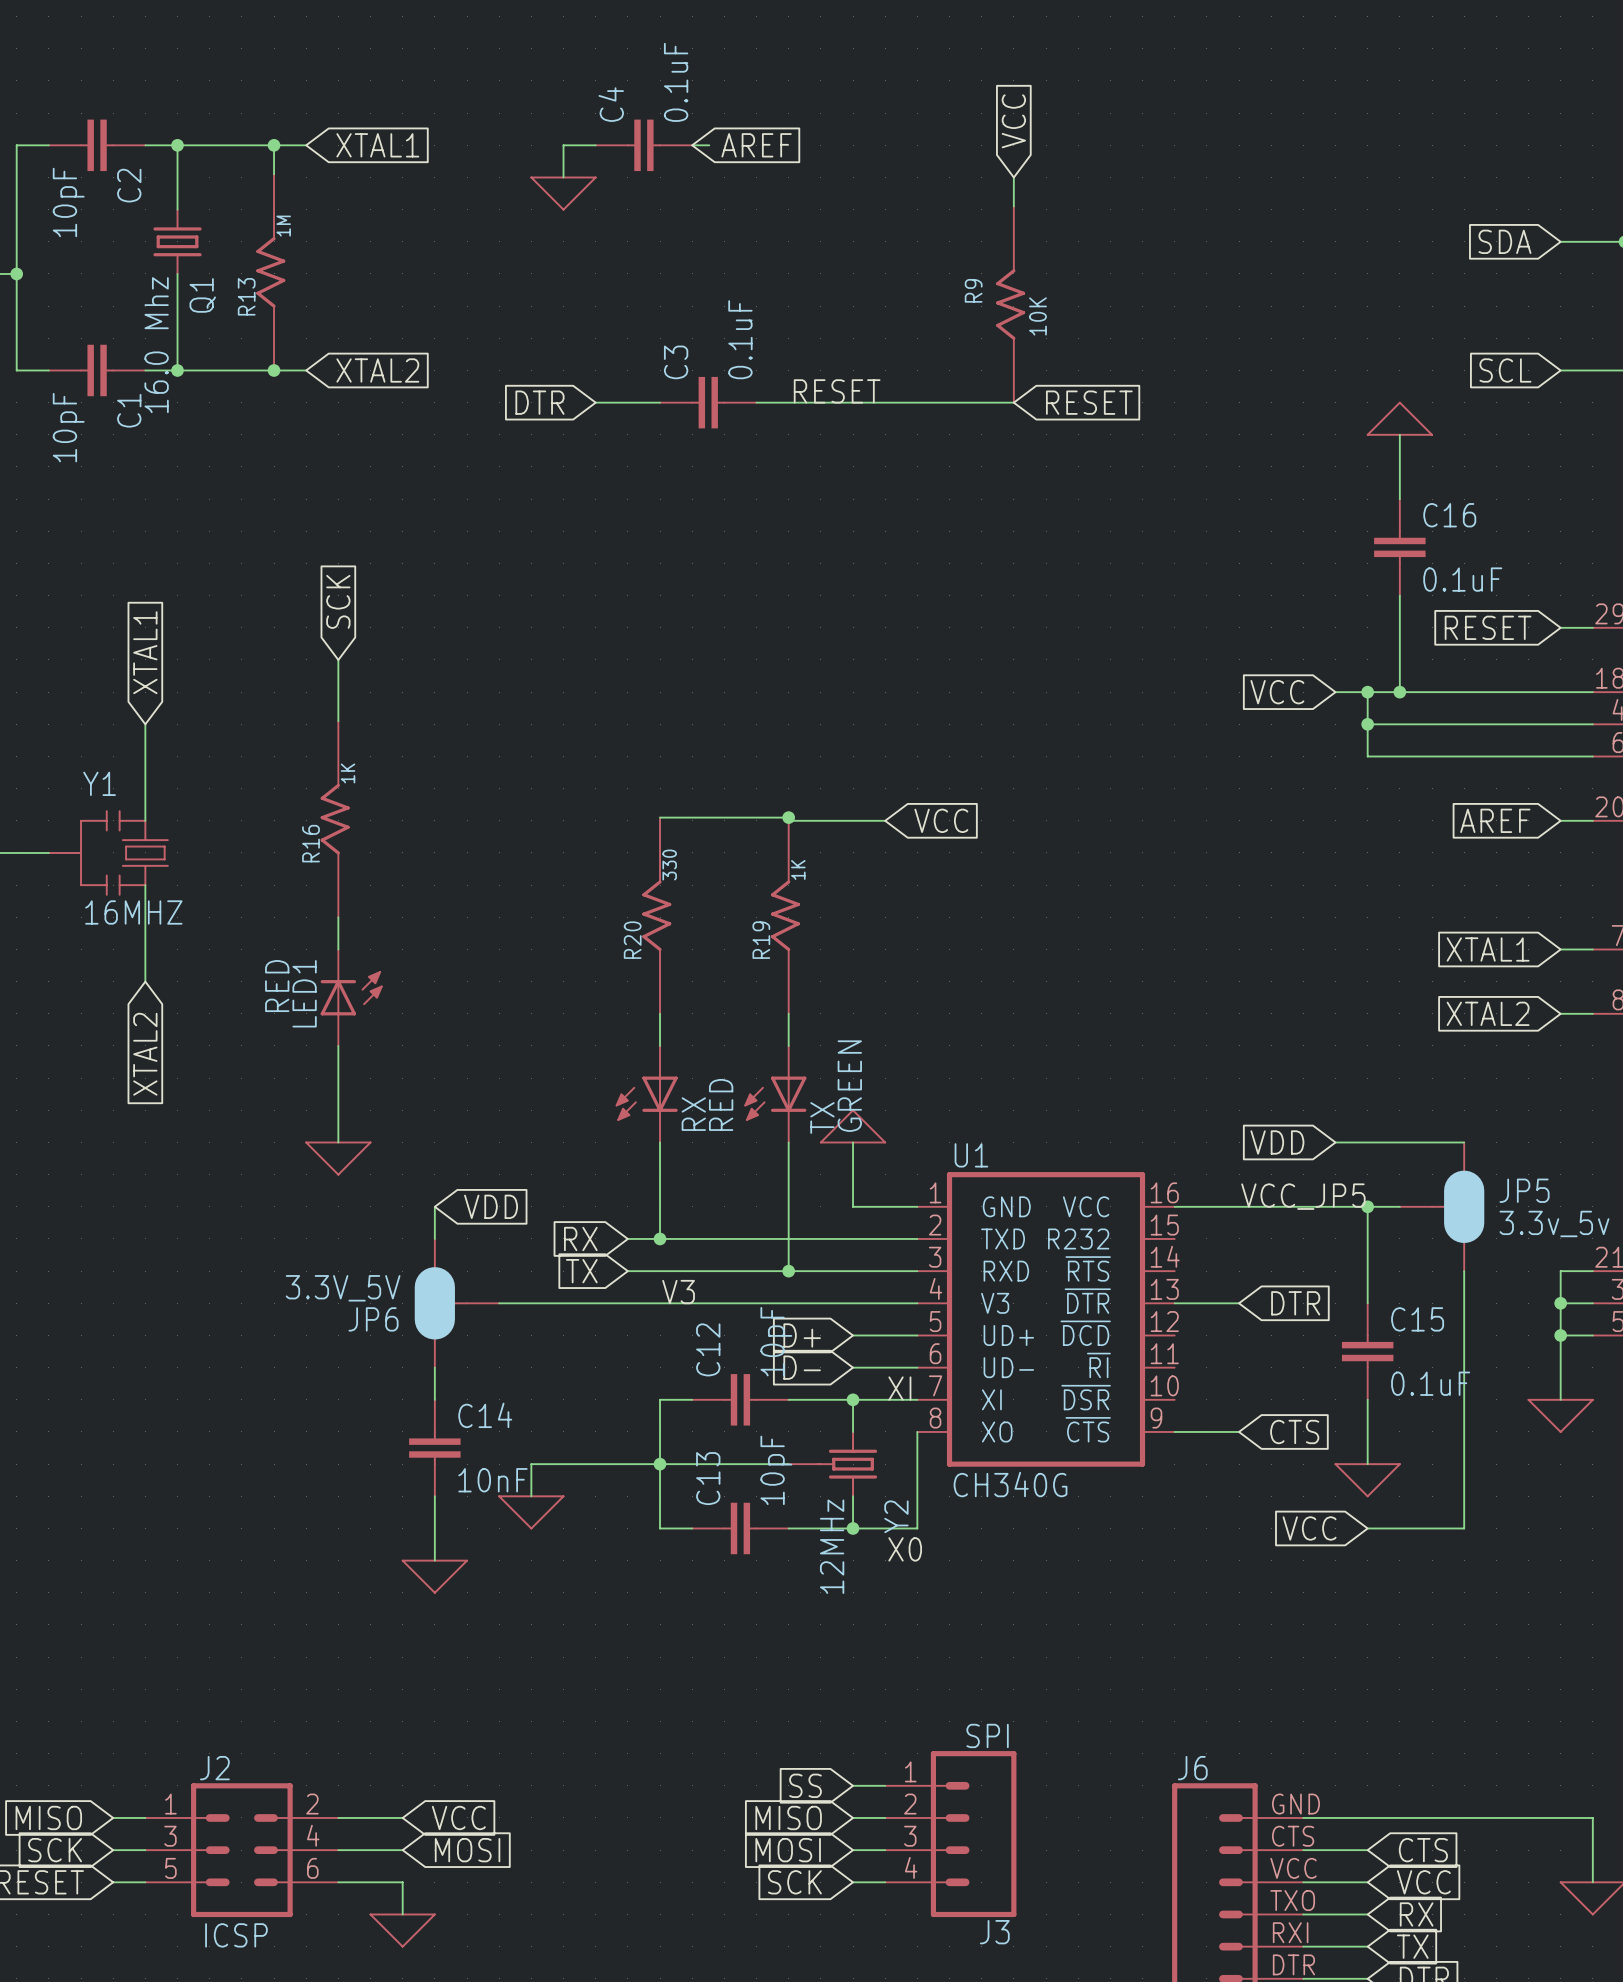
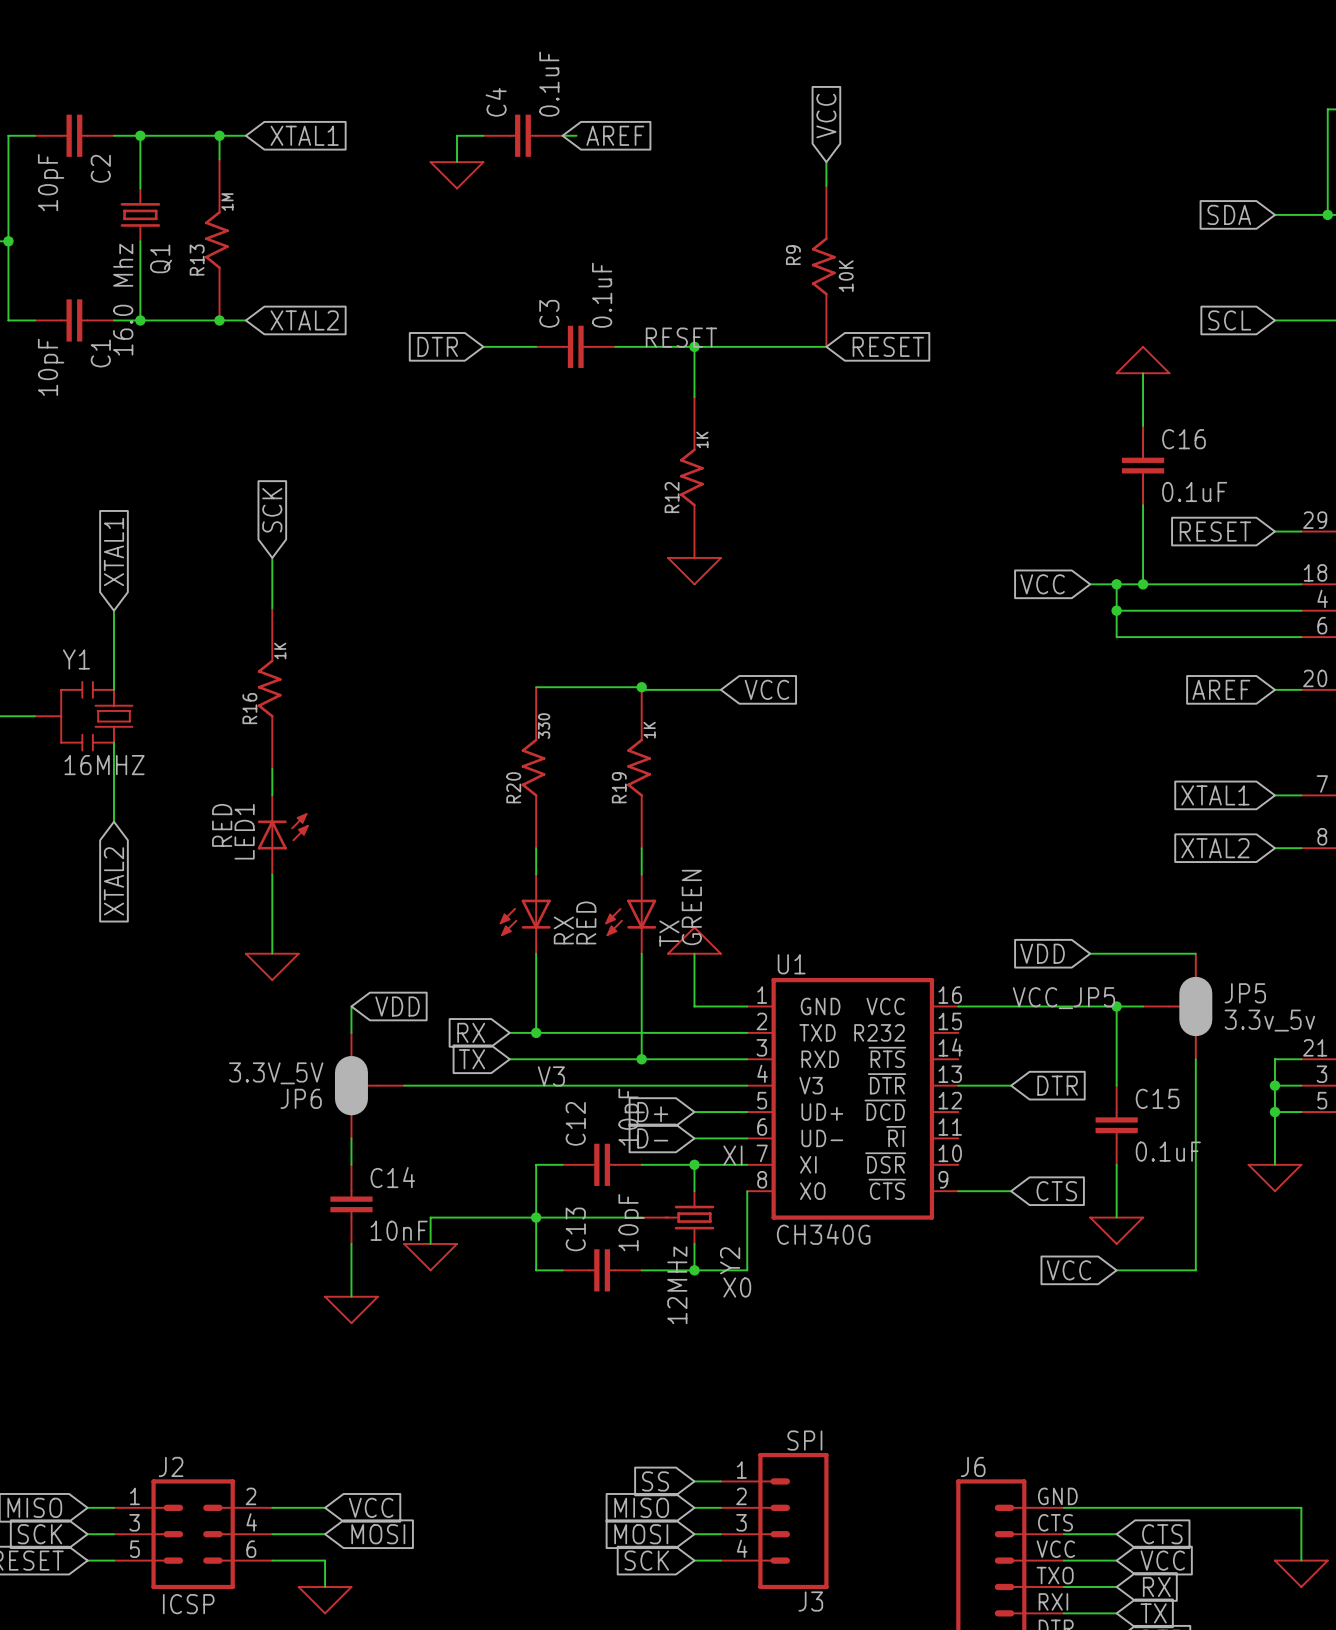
wire: none -> (694, 346) (694, 396)
junction: none -> (694, 346)
R12: none -> 1K (691, 477)
power symbol: none -> (694, 571)

